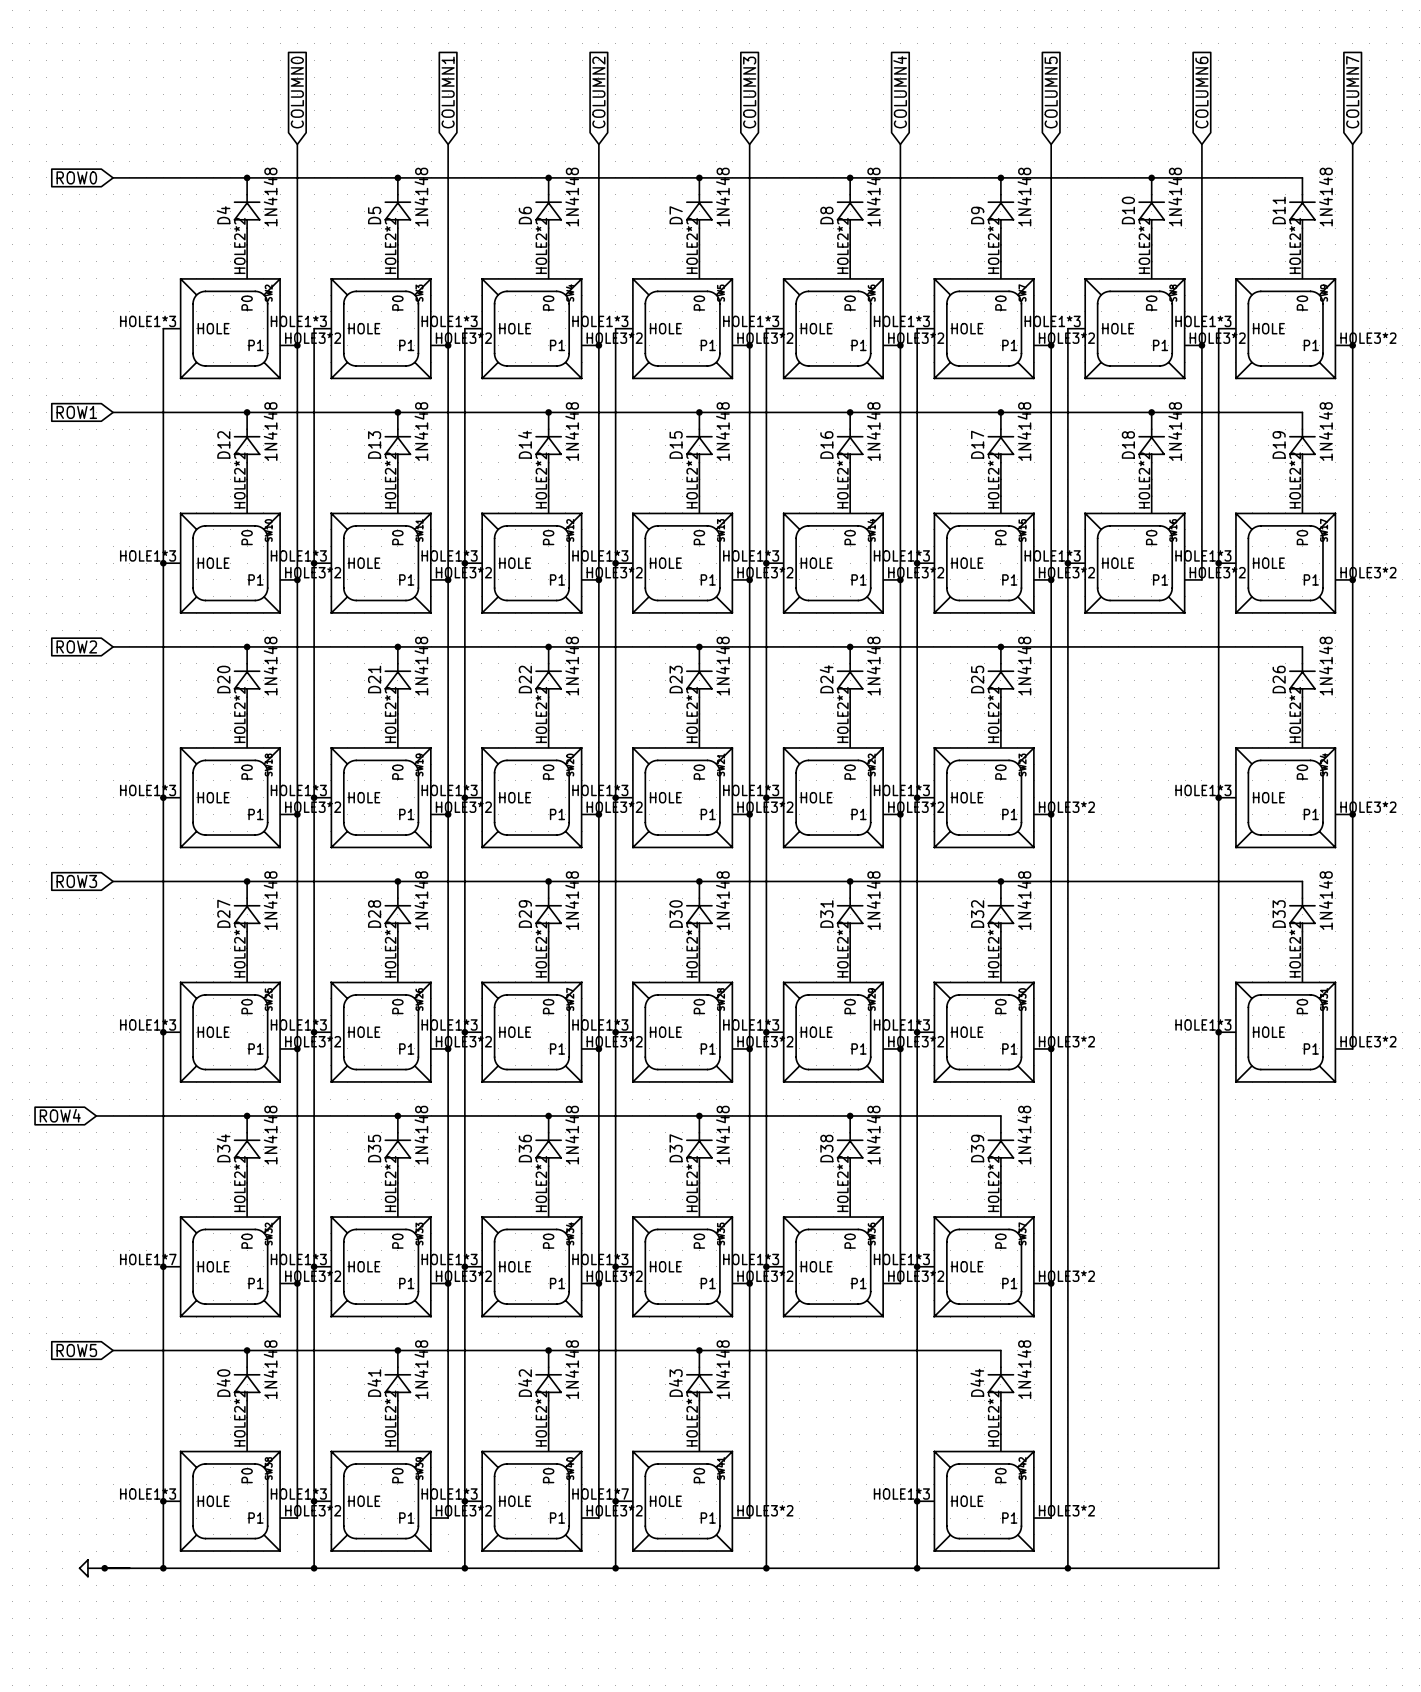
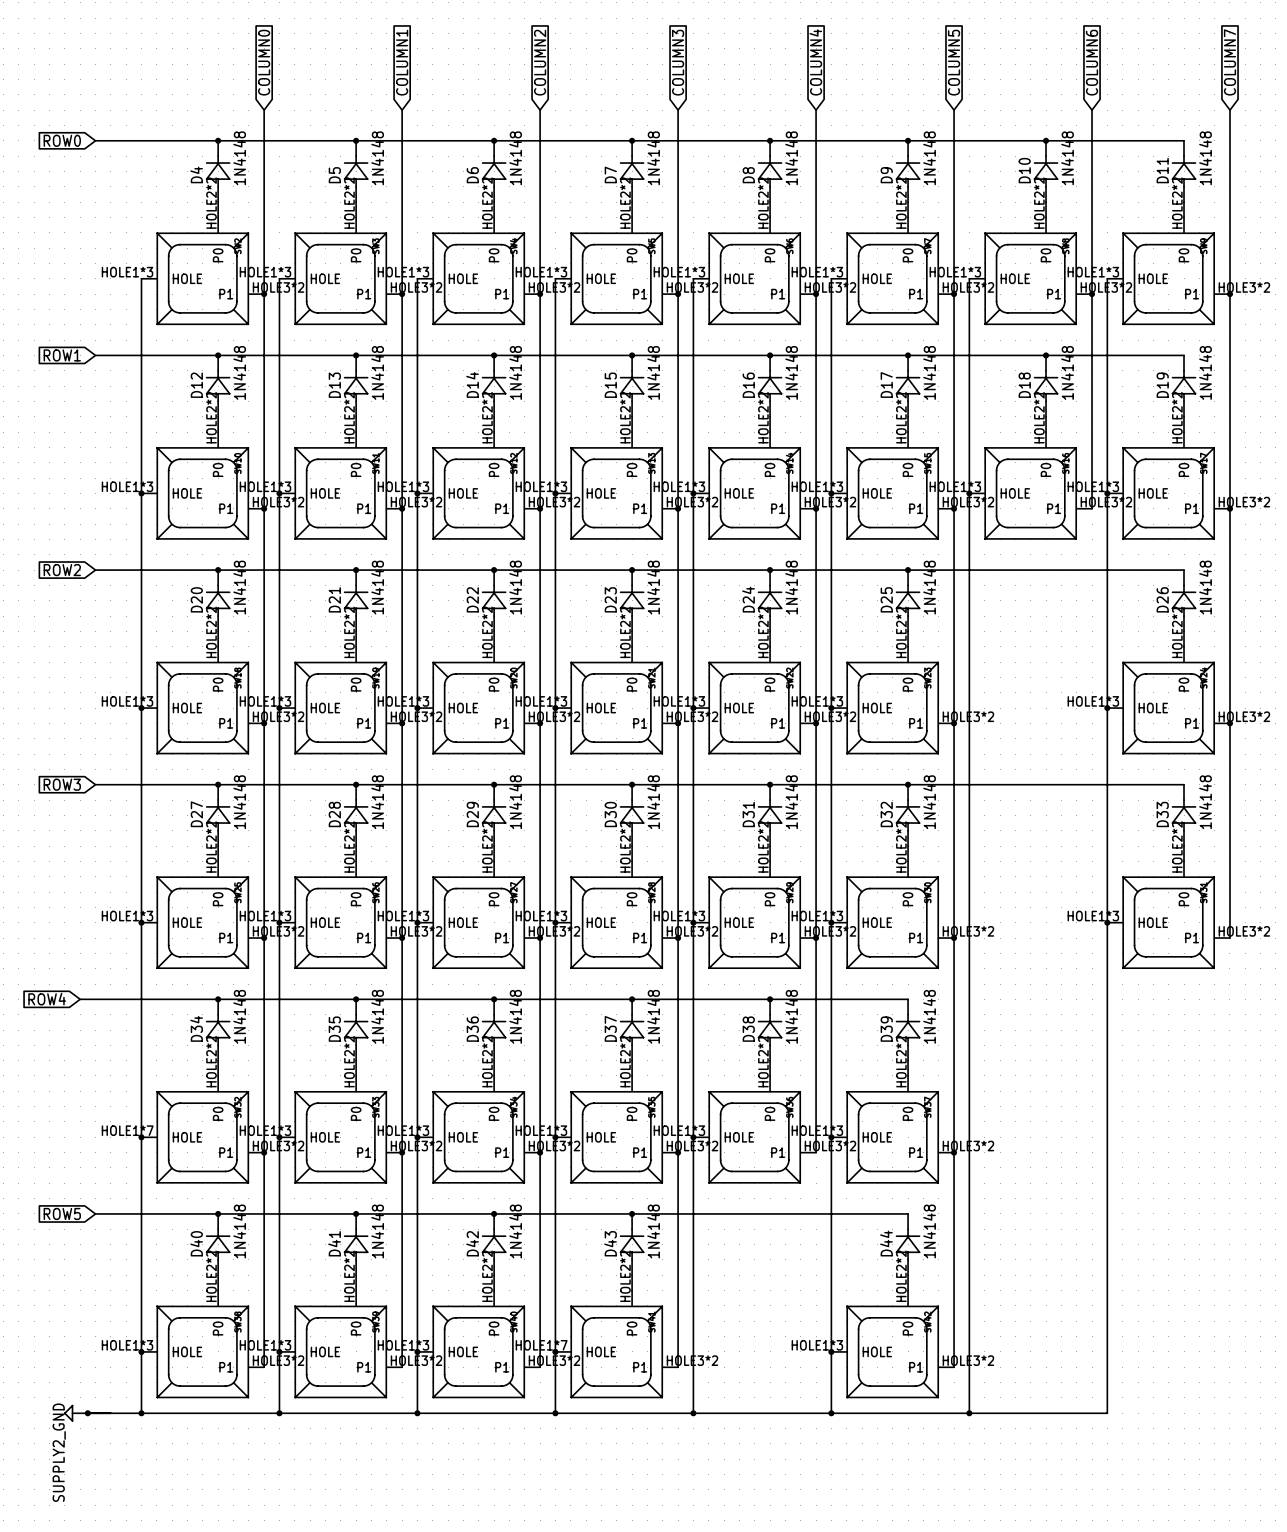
power symbol text: none -> SUPPLY2_GND (59, 1452)

